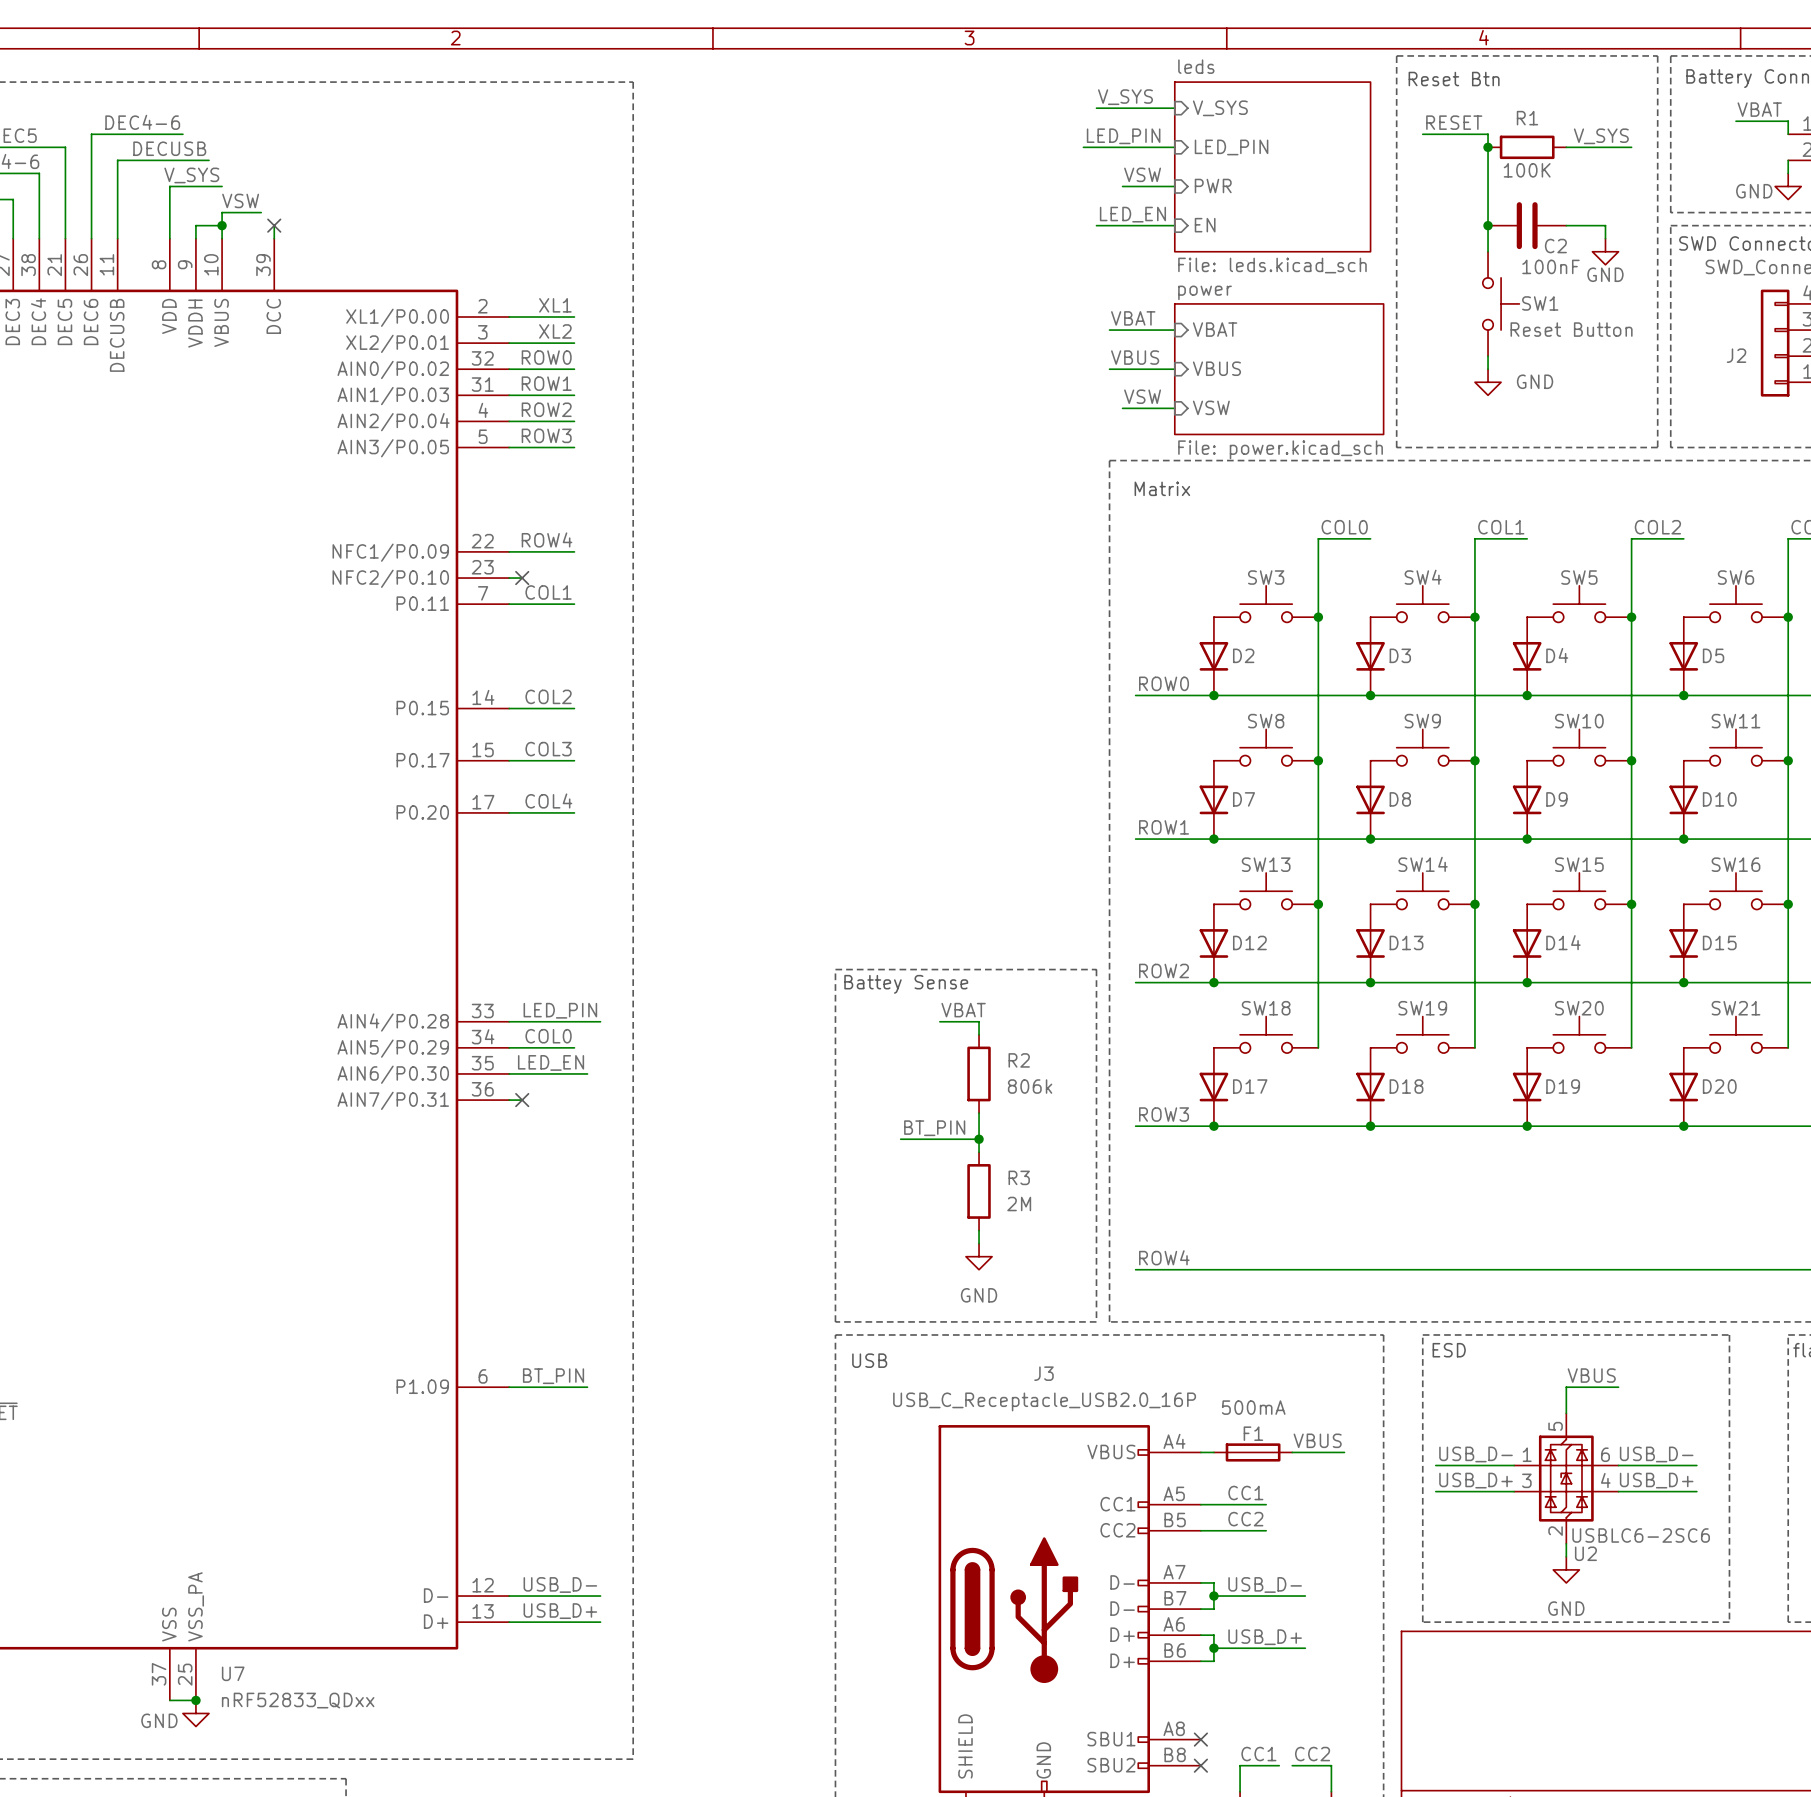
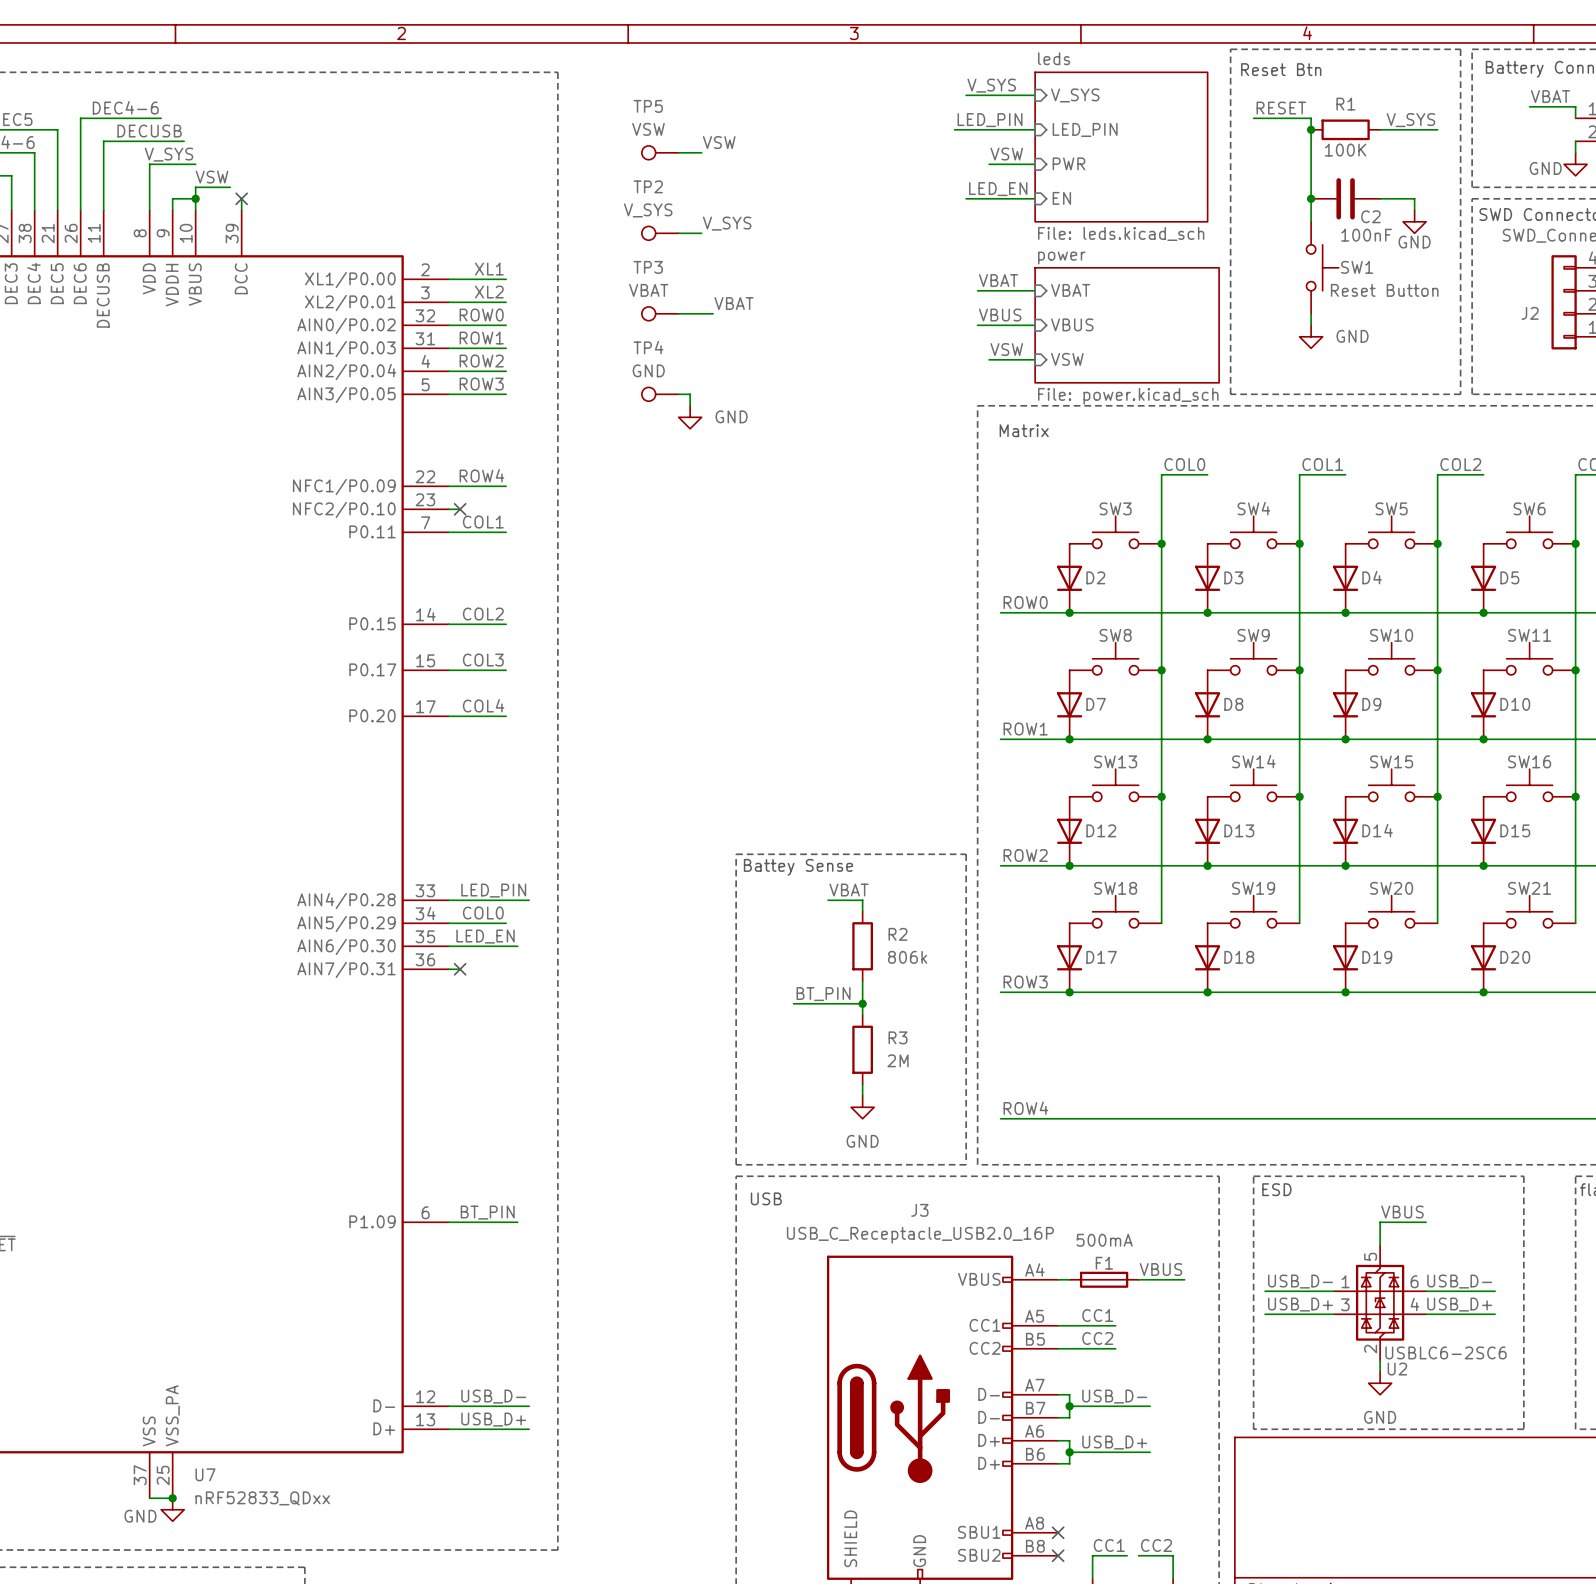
label: none -> VSW (719, 142)
TP5: none -> VSW (660, 152)
wire: none -> (678, 152) (701, 152)
label: none -> V_SYS (727, 223)
TP2: none -> V_SYS (660, 233)
wire: none -> (678, 233) (701, 233)
label: none -> VBAT (734, 303)
TP3: none -> VBAT (660, 313)
wire: none -> (678, 313) (713, 313)
TP4: none -> GND (660, 394)
wire: none -> (678, 394) (690, 394) (690, 405)
power symbol: none -> GND (690, 417)

